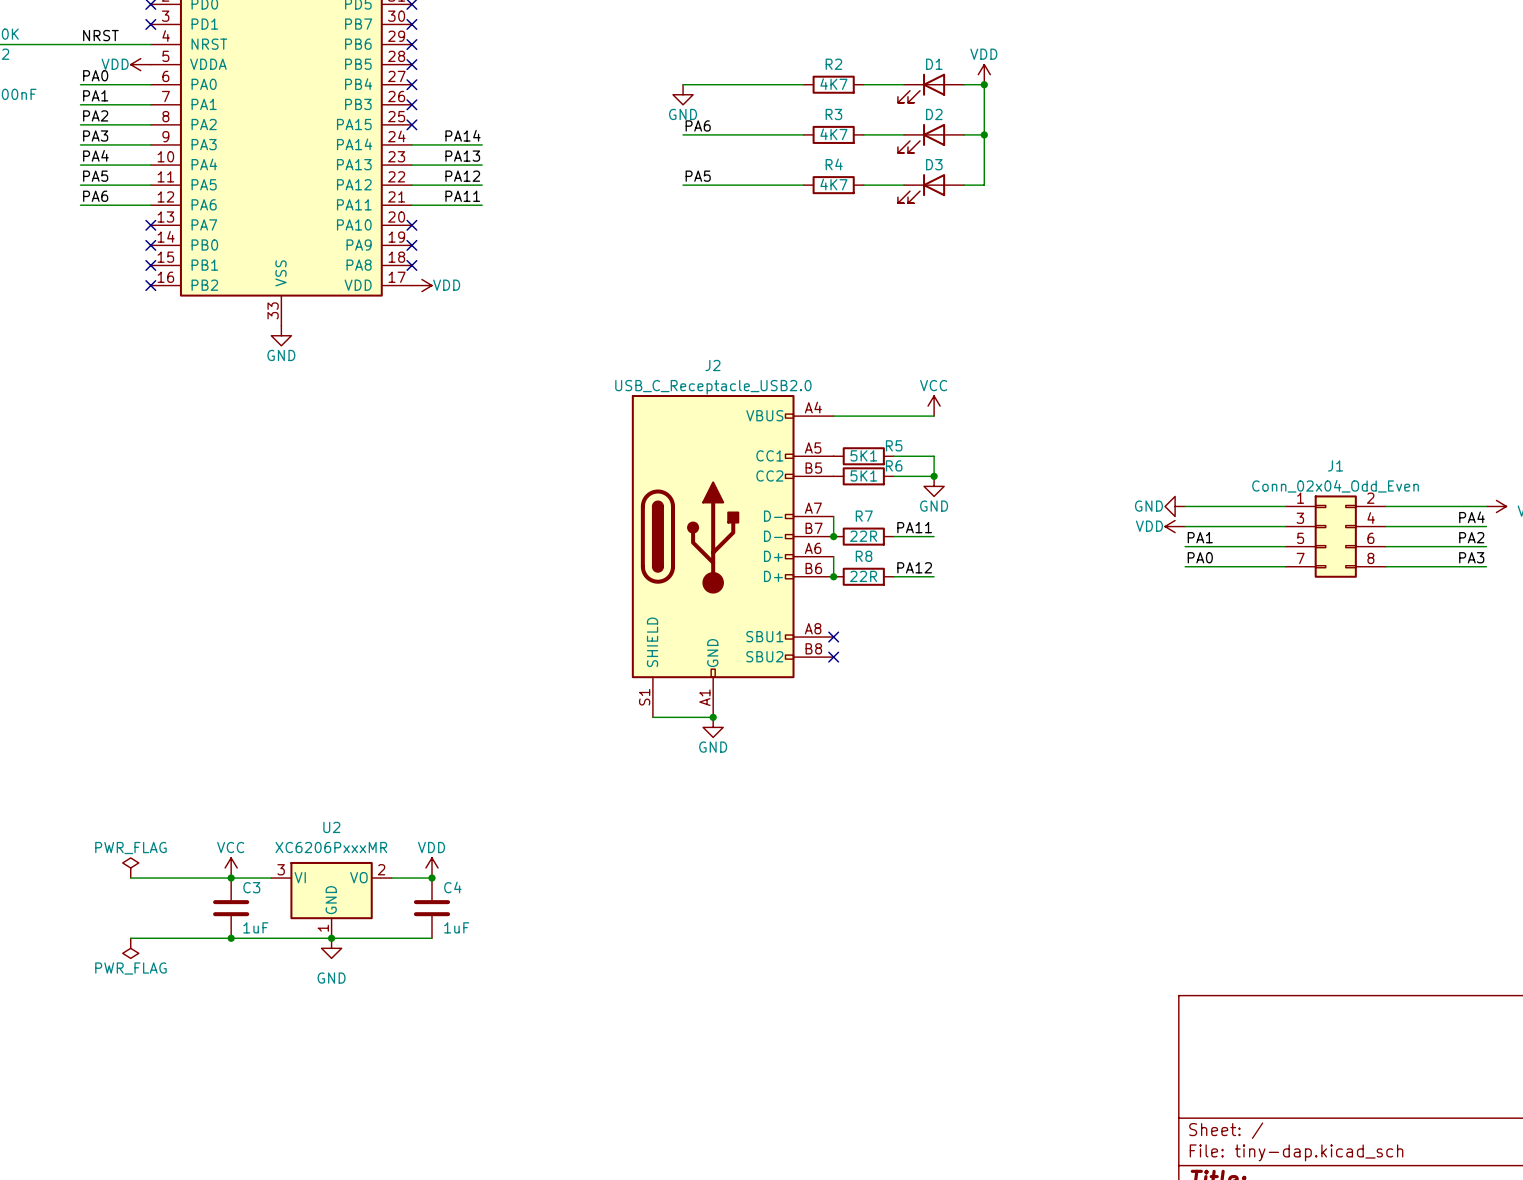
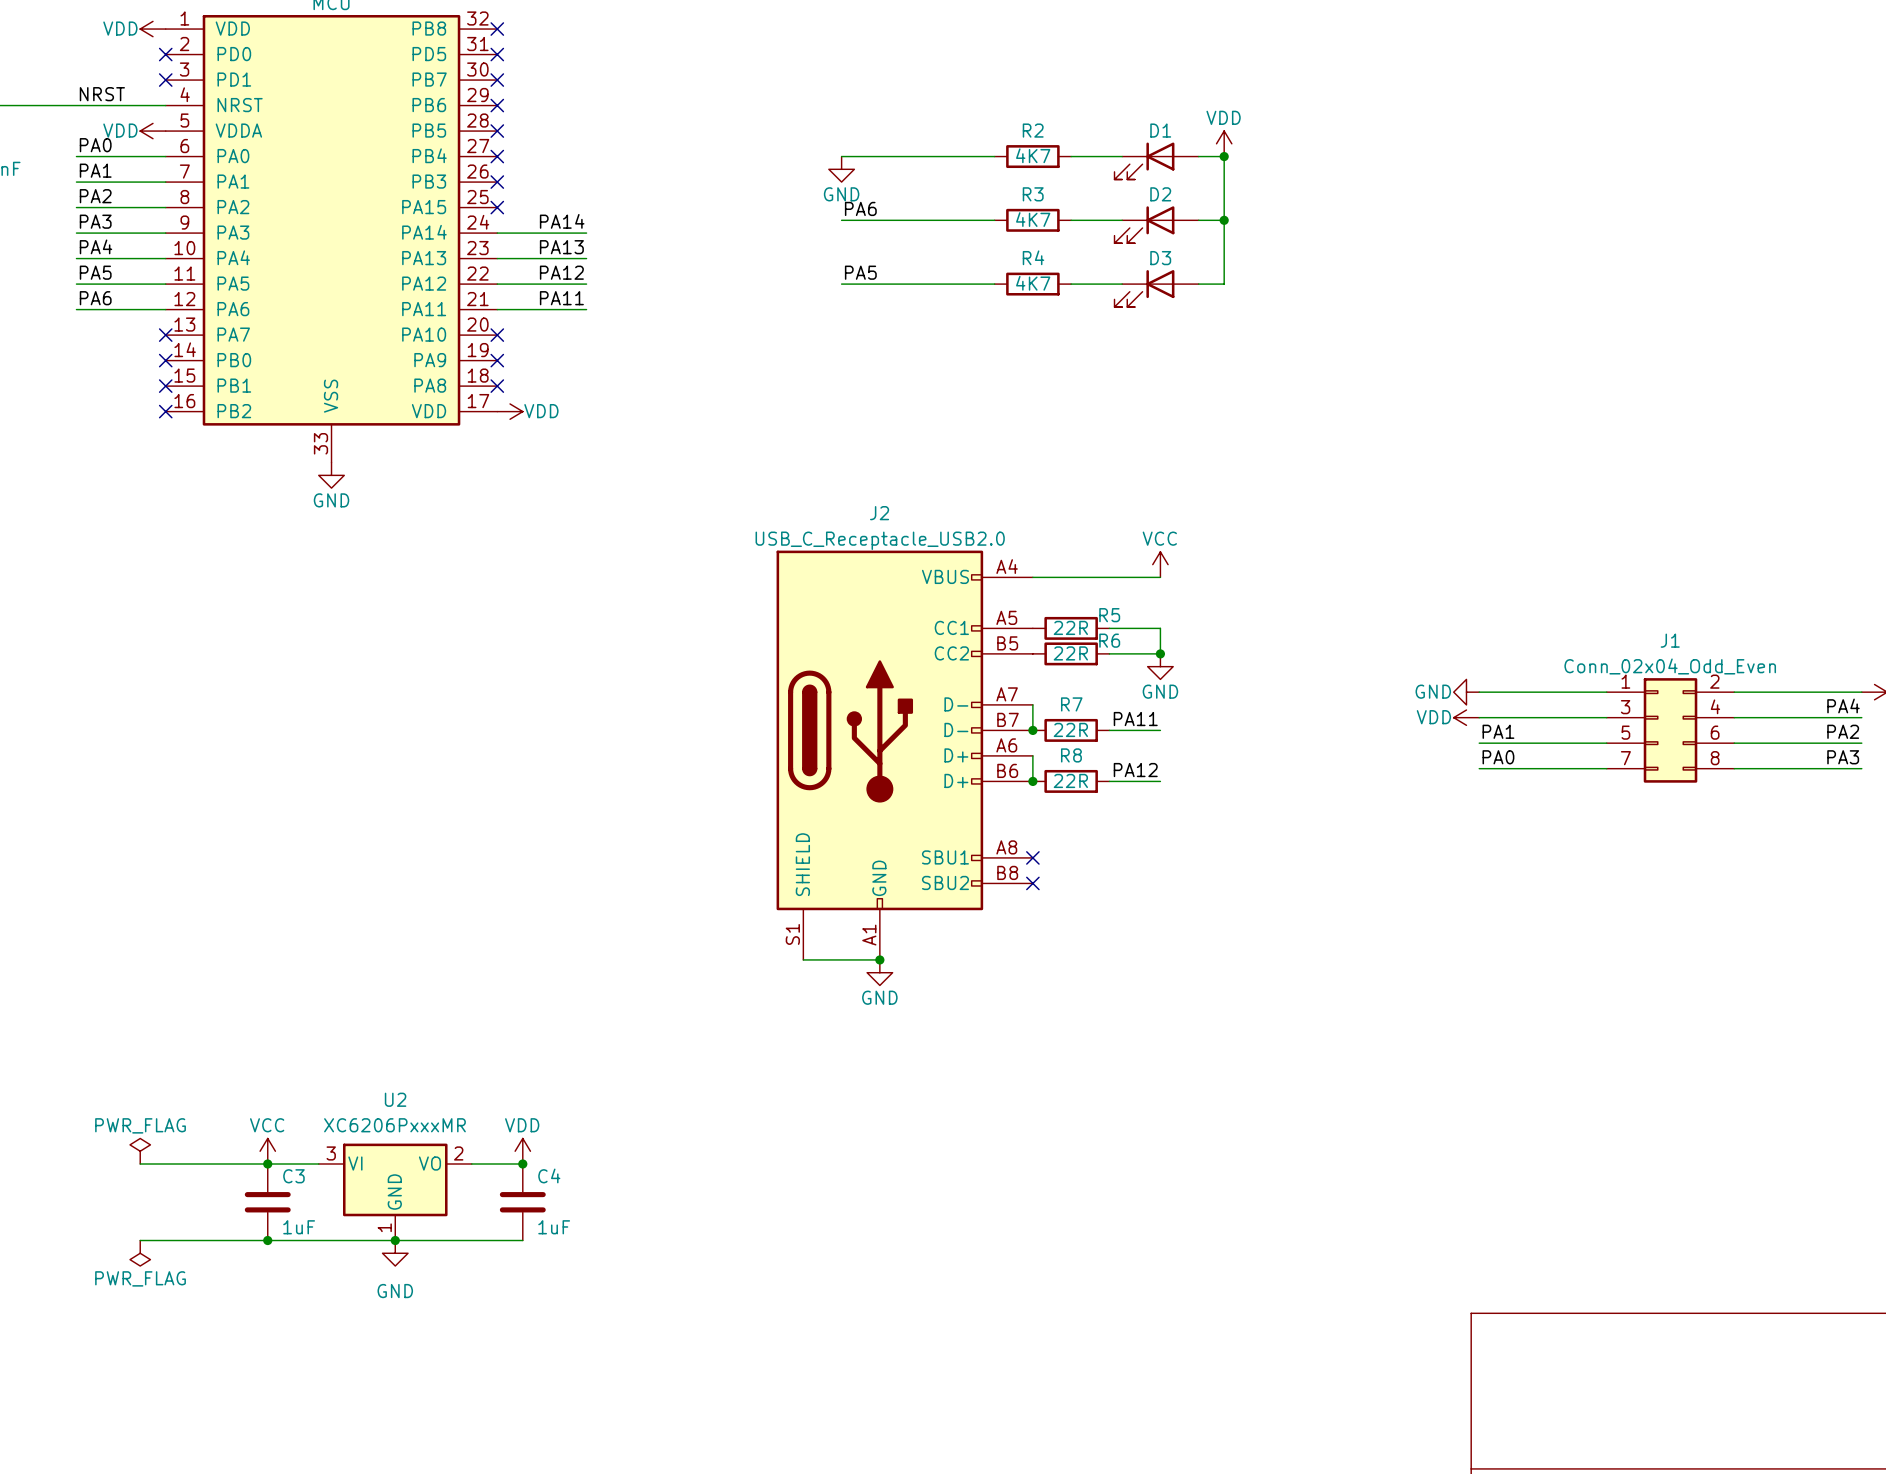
R5 value: 5K1 (863, 455) -> 22R (1070, 627)
R6 value: 5K1 (863, 475) -> 22R (1070, 653)

